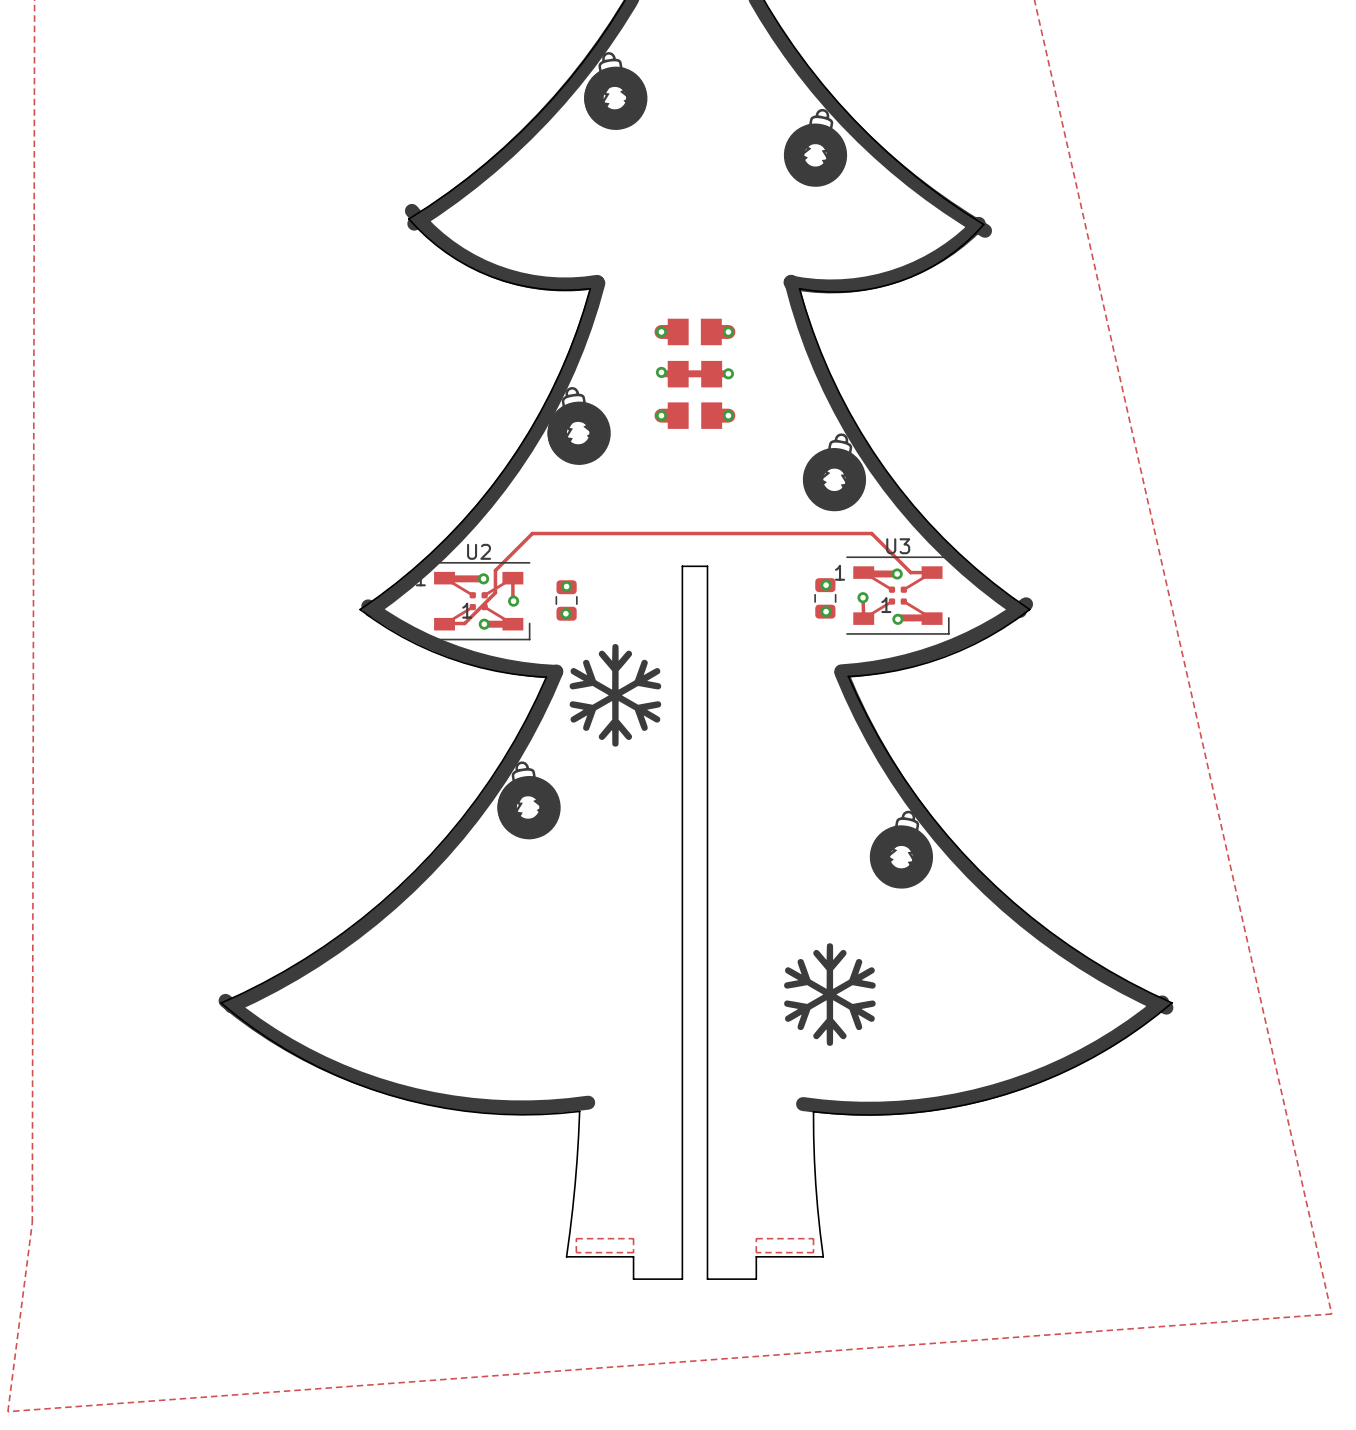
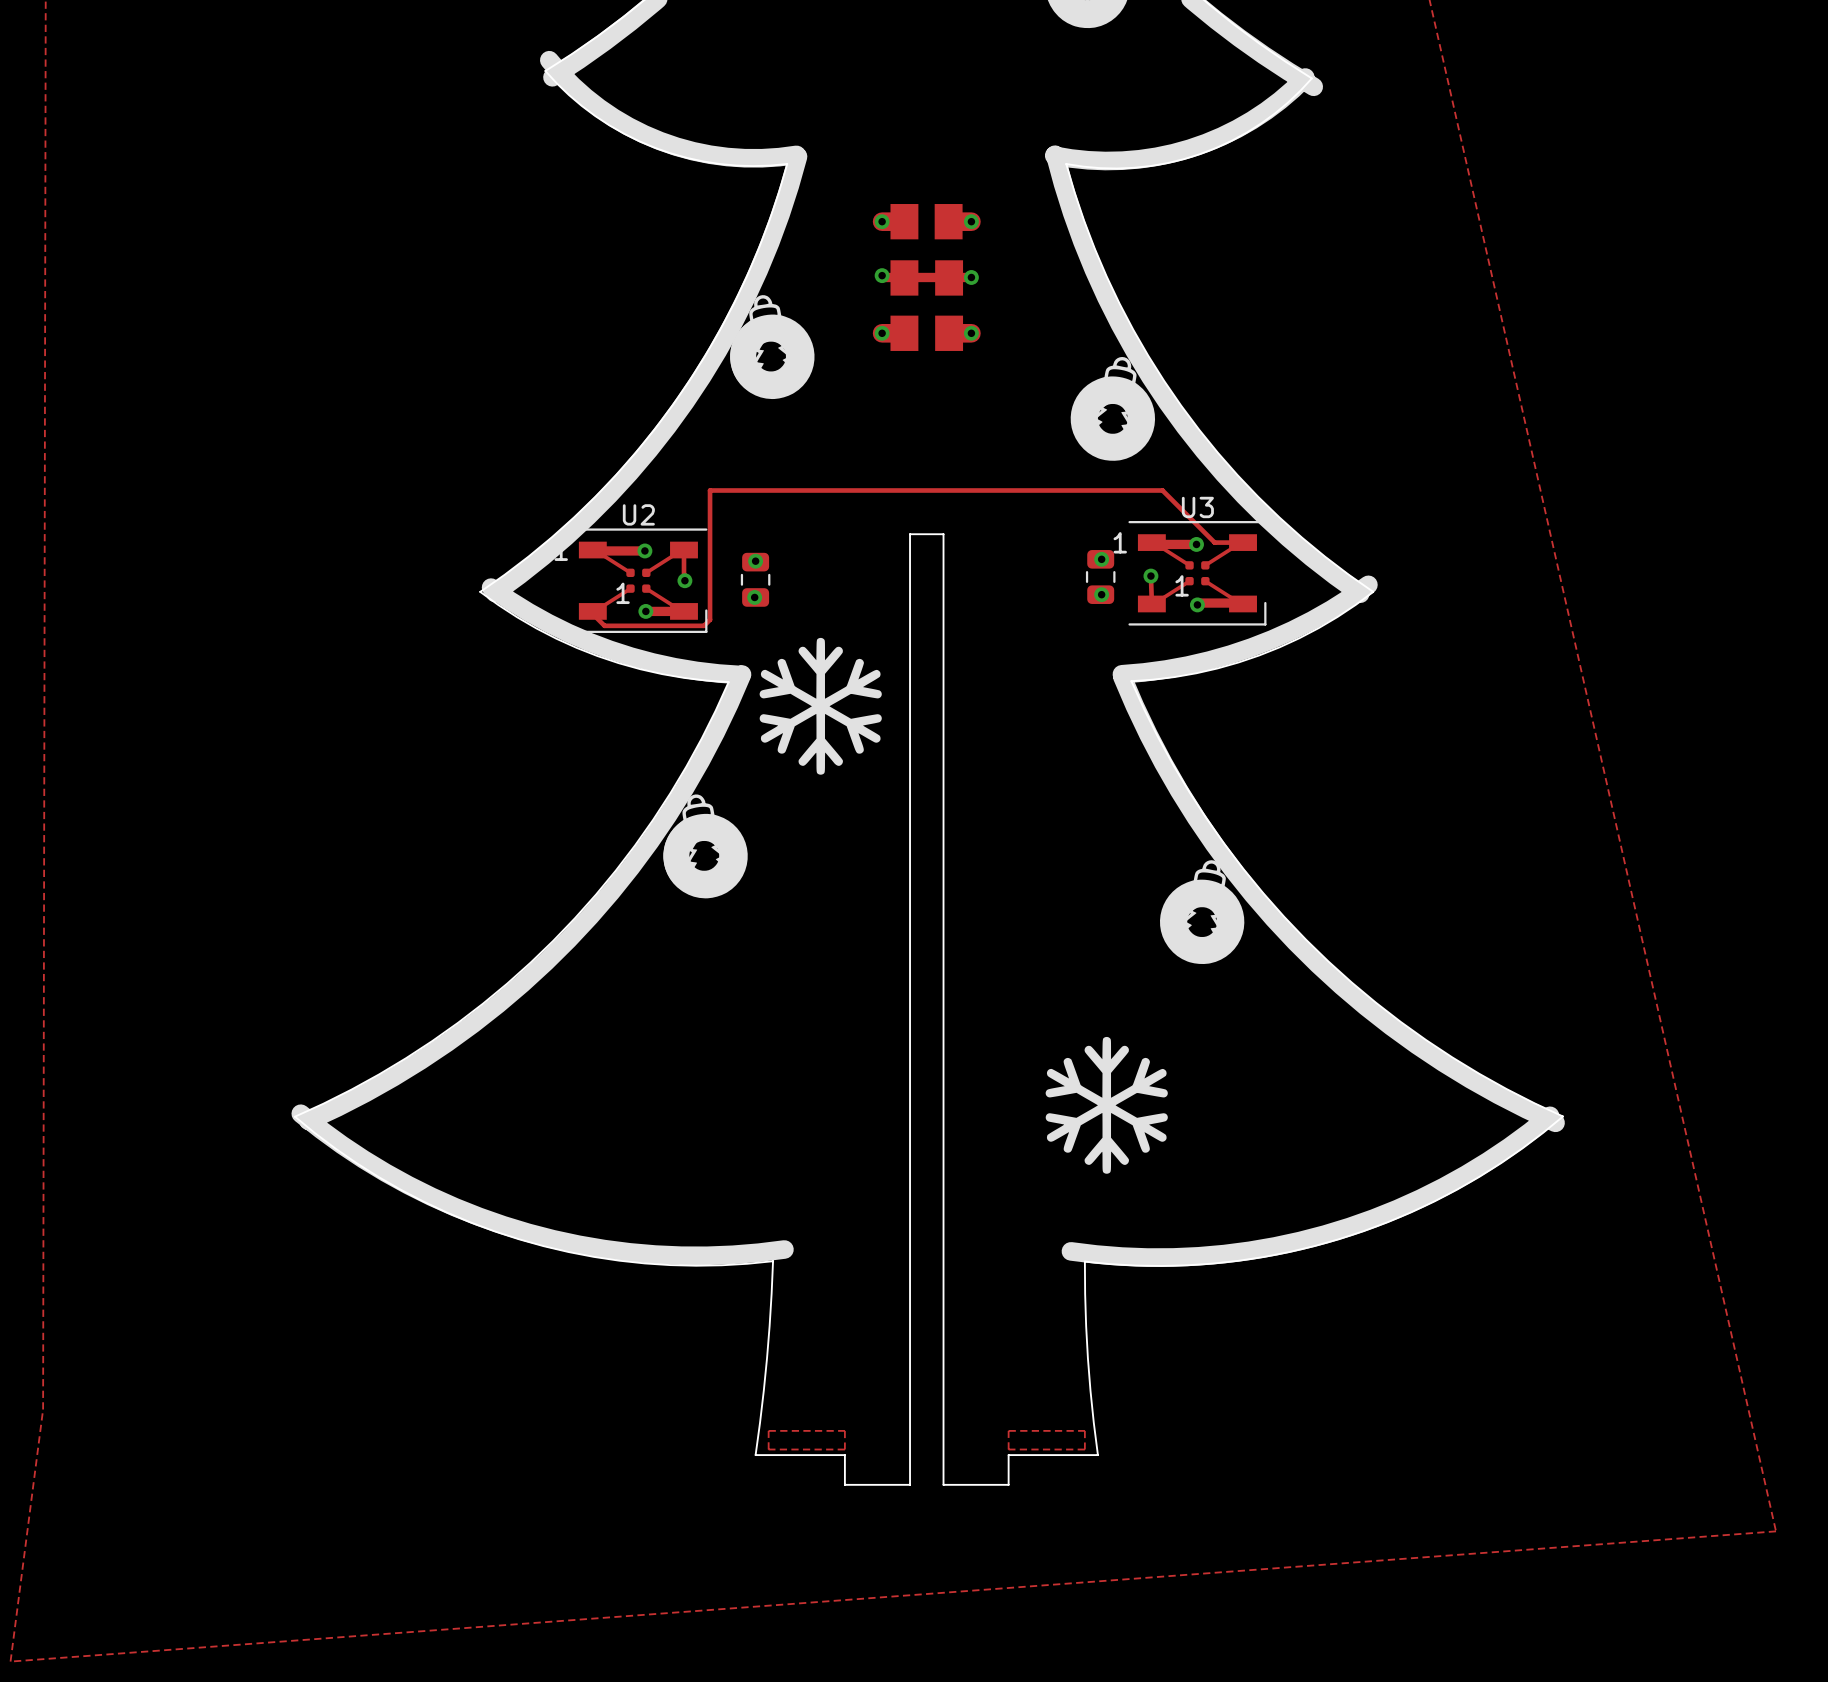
track: (532, 533) (495, 570) (495, 592) (464, 623) (444, 623) -> (710, 490) (710, 619) (703, 625) (604, 625) (596, 618)
U3 footprint: [846, 556, 950, 635] -> [1128, 521, 1267, 626]
U2 footprint: [426, 561, 531, 641] -> [569, 528, 708, 634]

